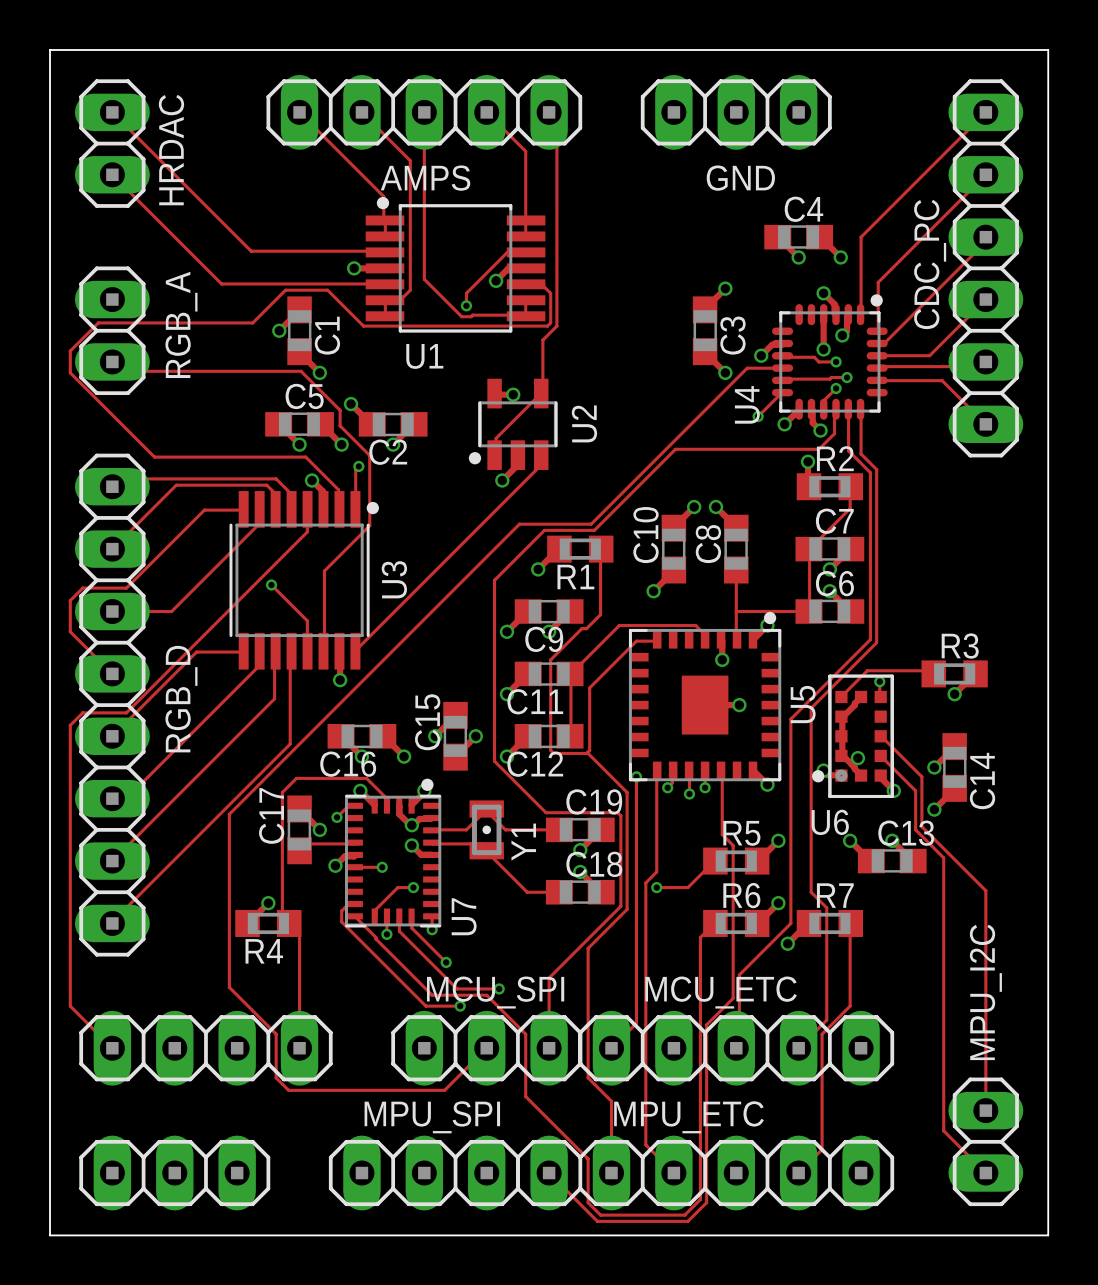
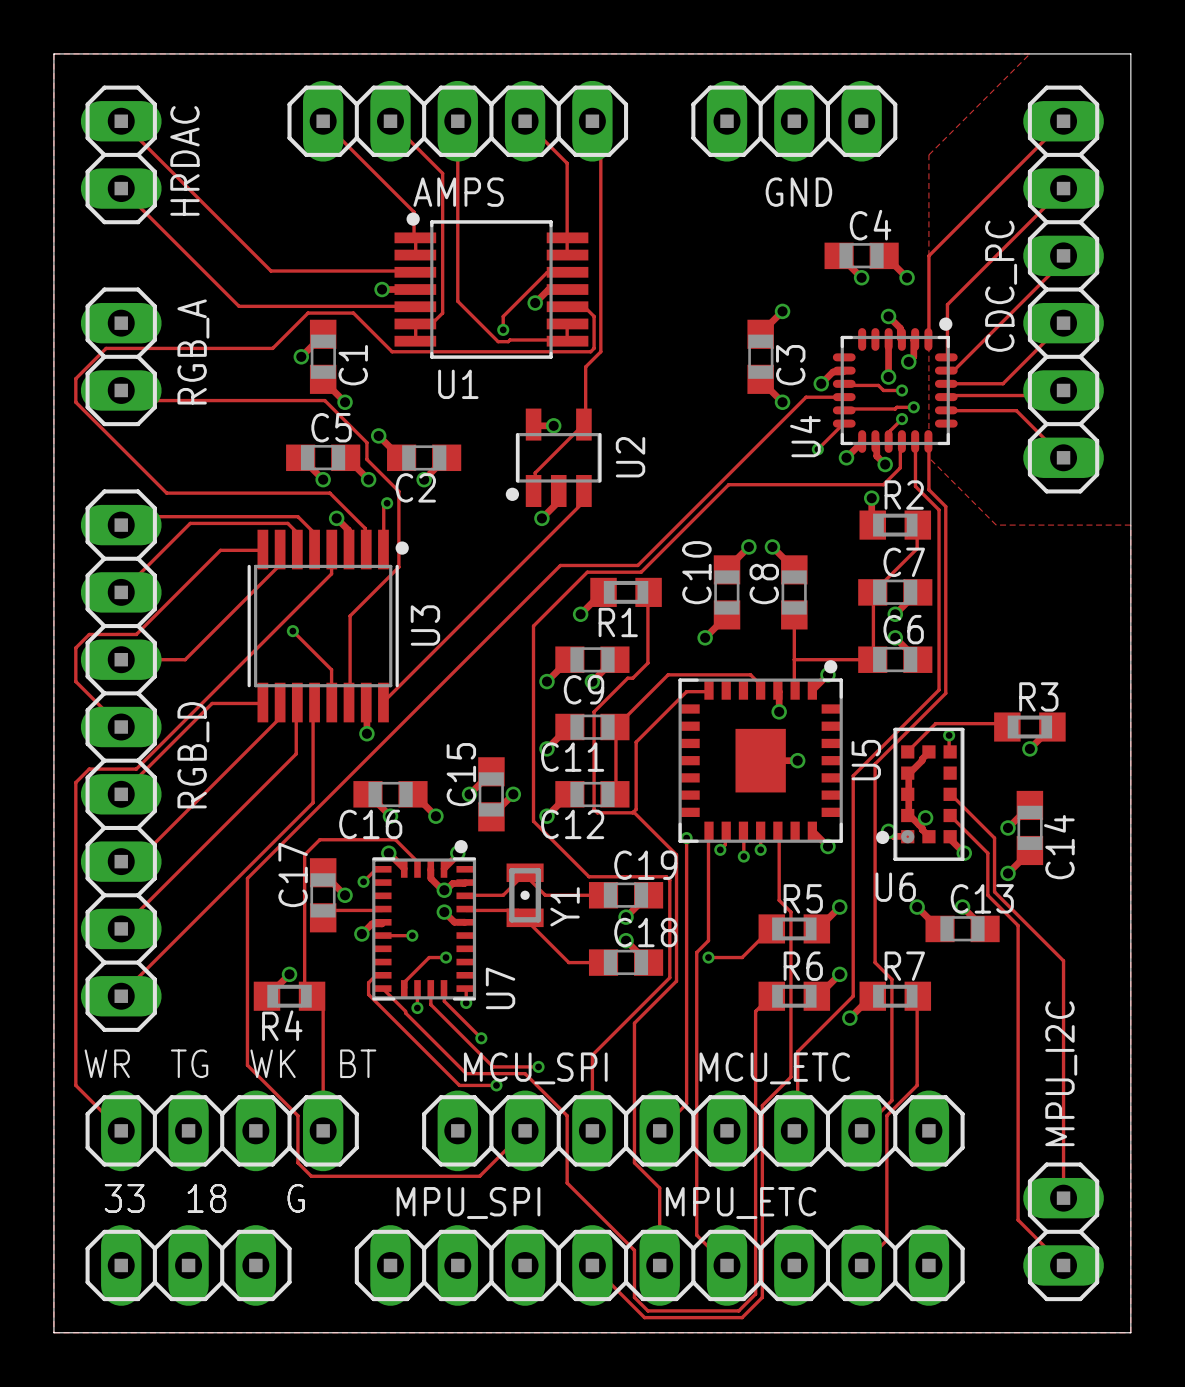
zone outline: none -> (53, 53) (1029, 53) (928, 154) (928, 457) (996, 525) (1130, 525) (1130, 1332) (53, 1332) (53, 53)
text: none -> WR TG WK BT (230, 1063)
text: none -> 33 18 G (204, 1198)

